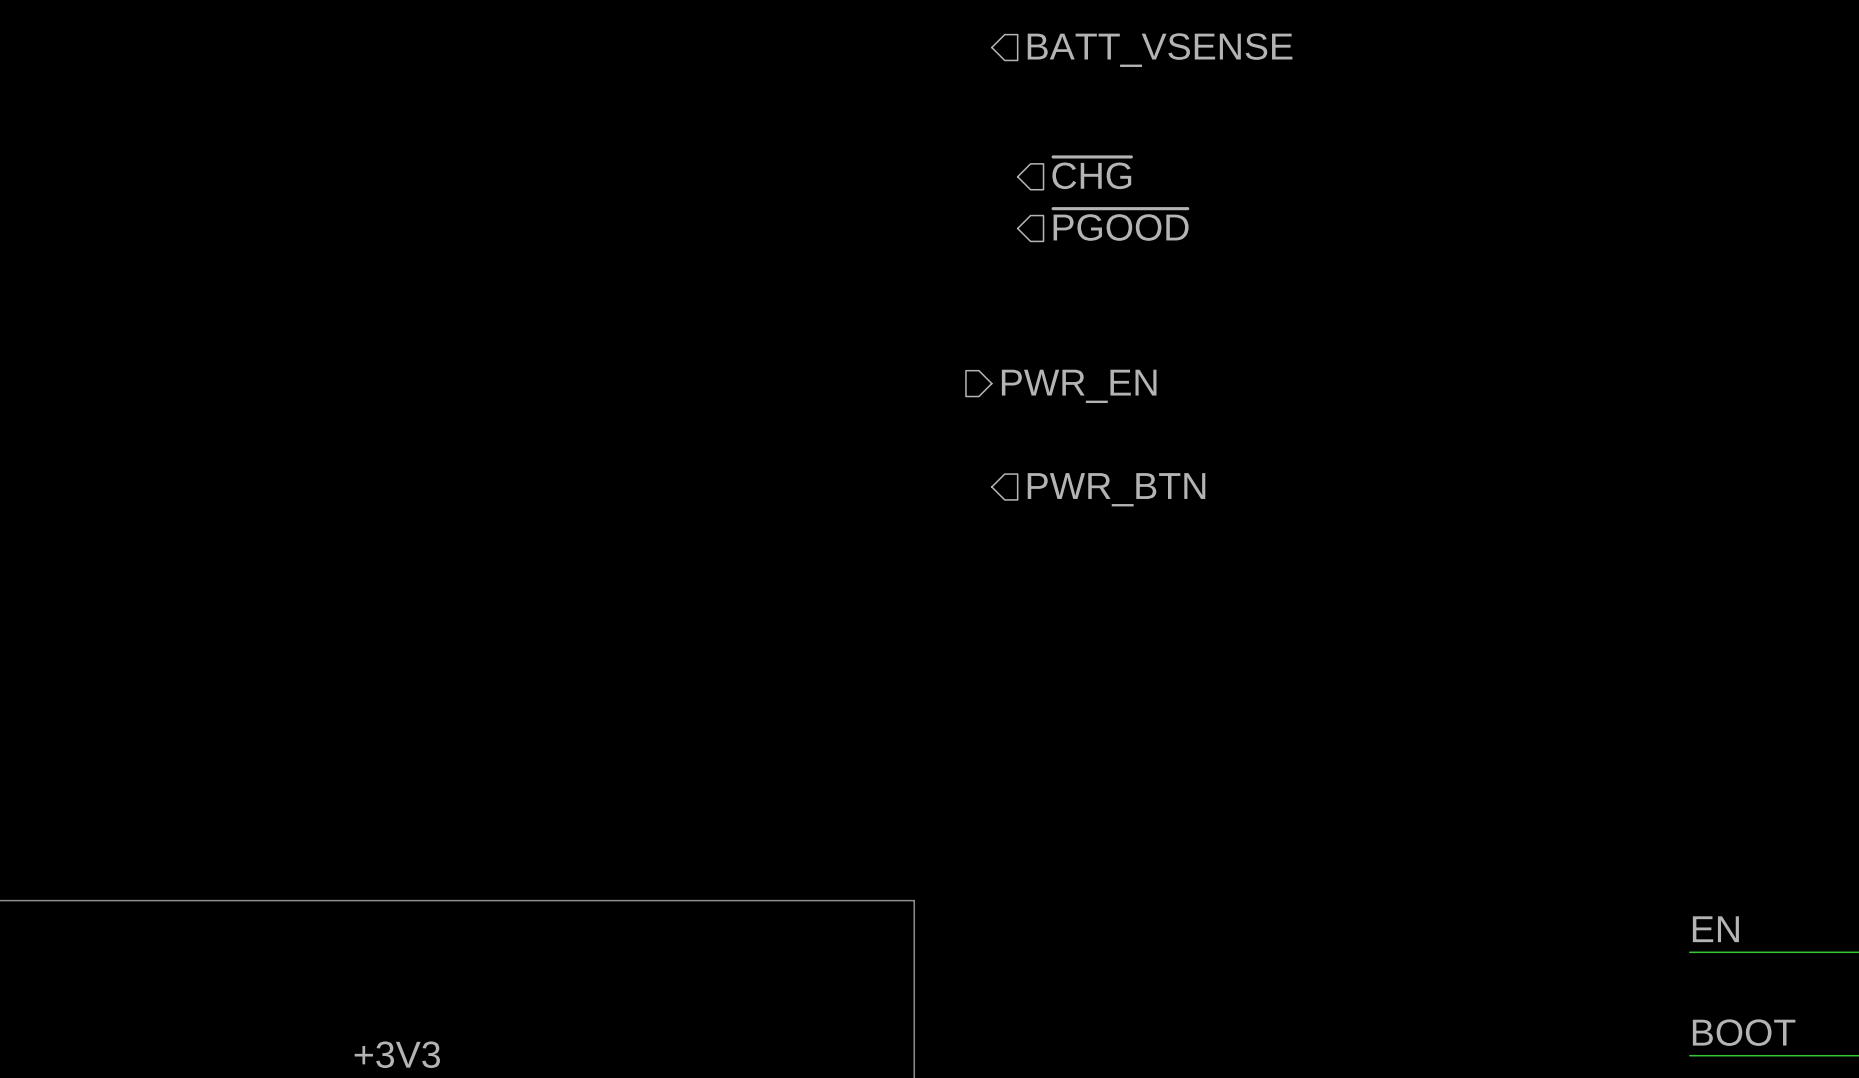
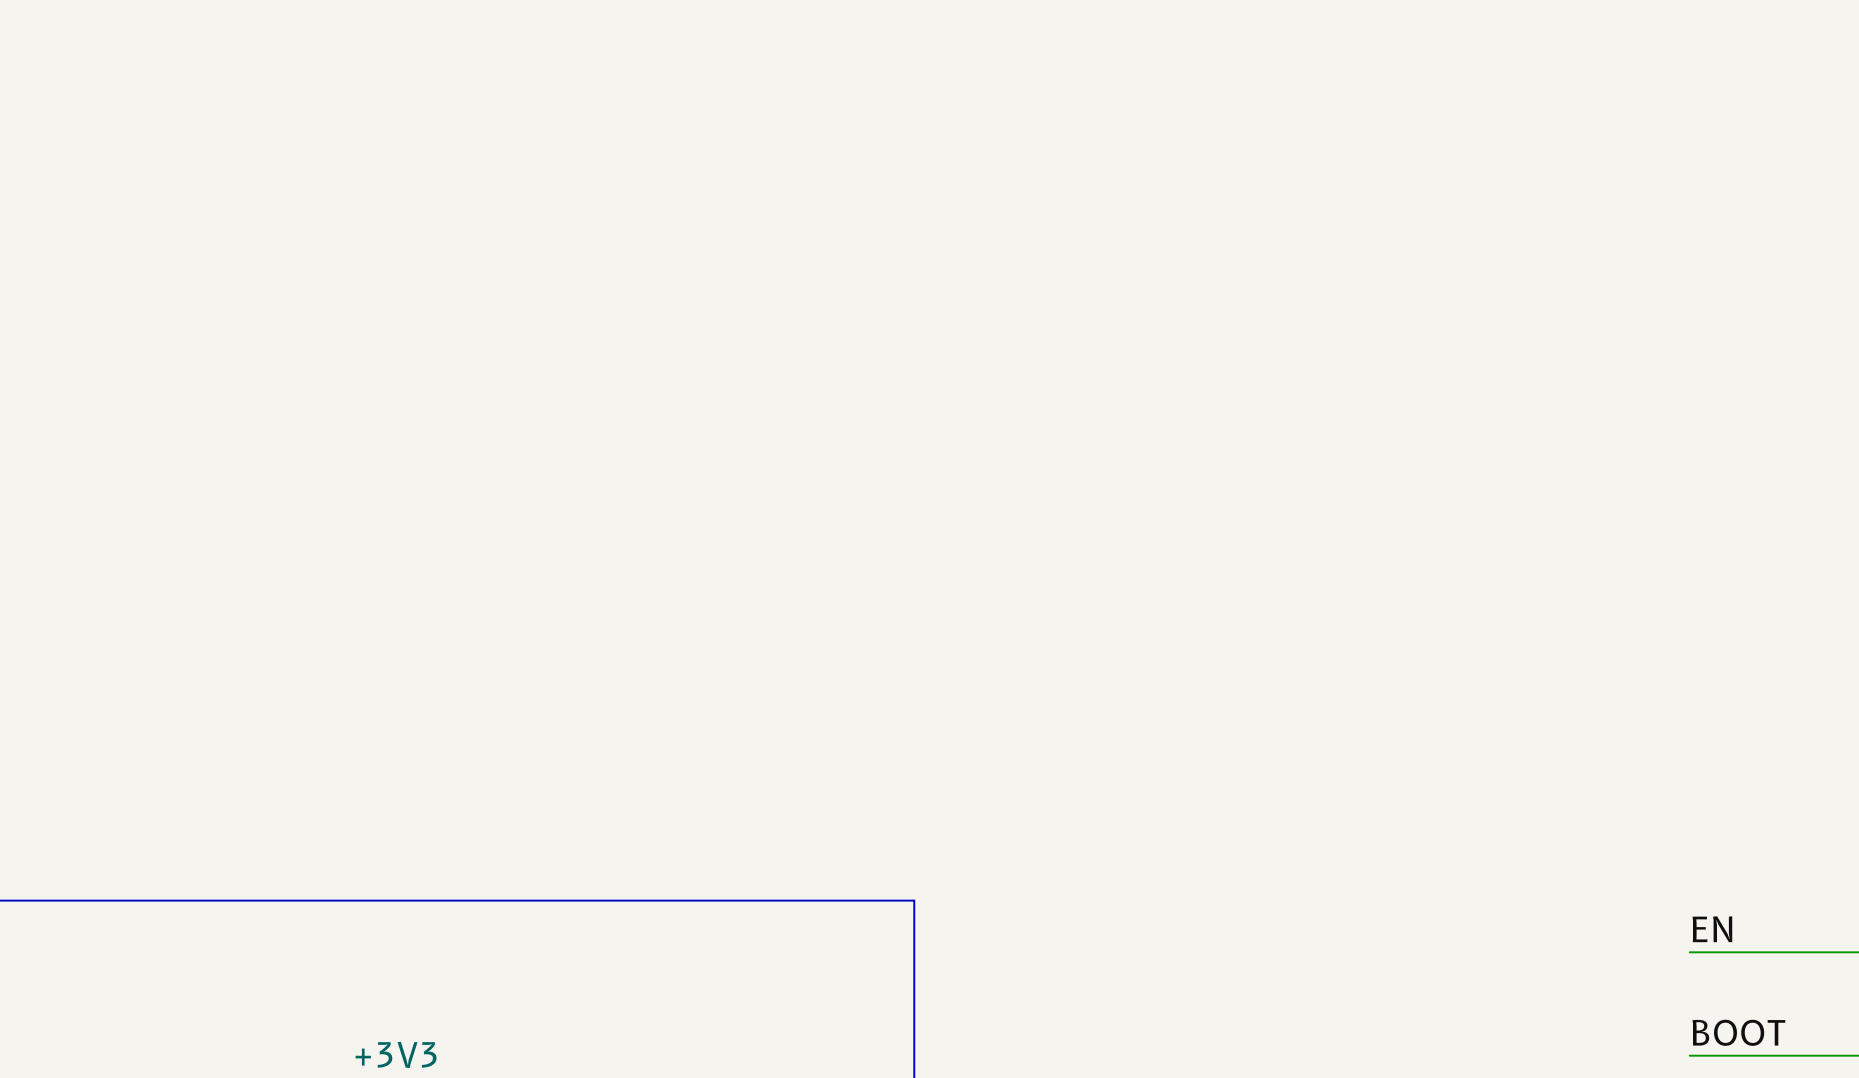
hierarchical label: BATT_VSENSE (1160, 50) -> none
hierarchical label: ~{CHG} (1091, 173) -> none
hierarchical label: ~{PGOOD} (1120, 224) -> none
hierarchical label: PWR_EN (1079, 386) -> none
hierarchical label: PWR_BTN (1116, 489) -> none

